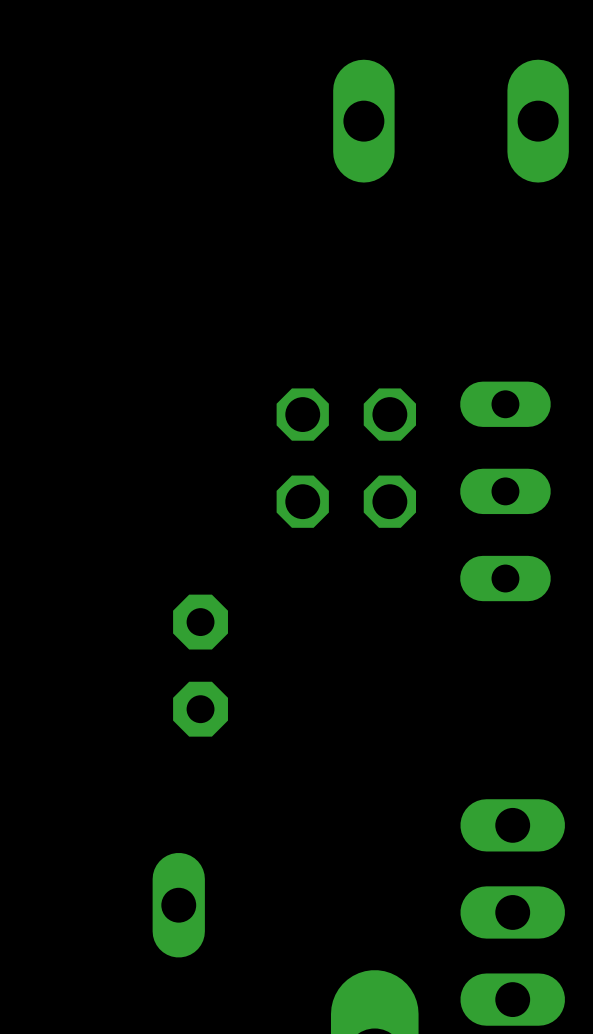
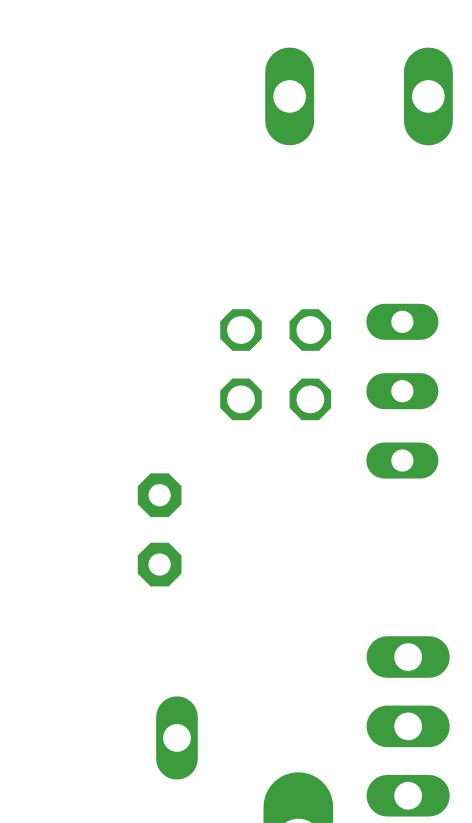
part position: (178, 905) -> (176, 737)

